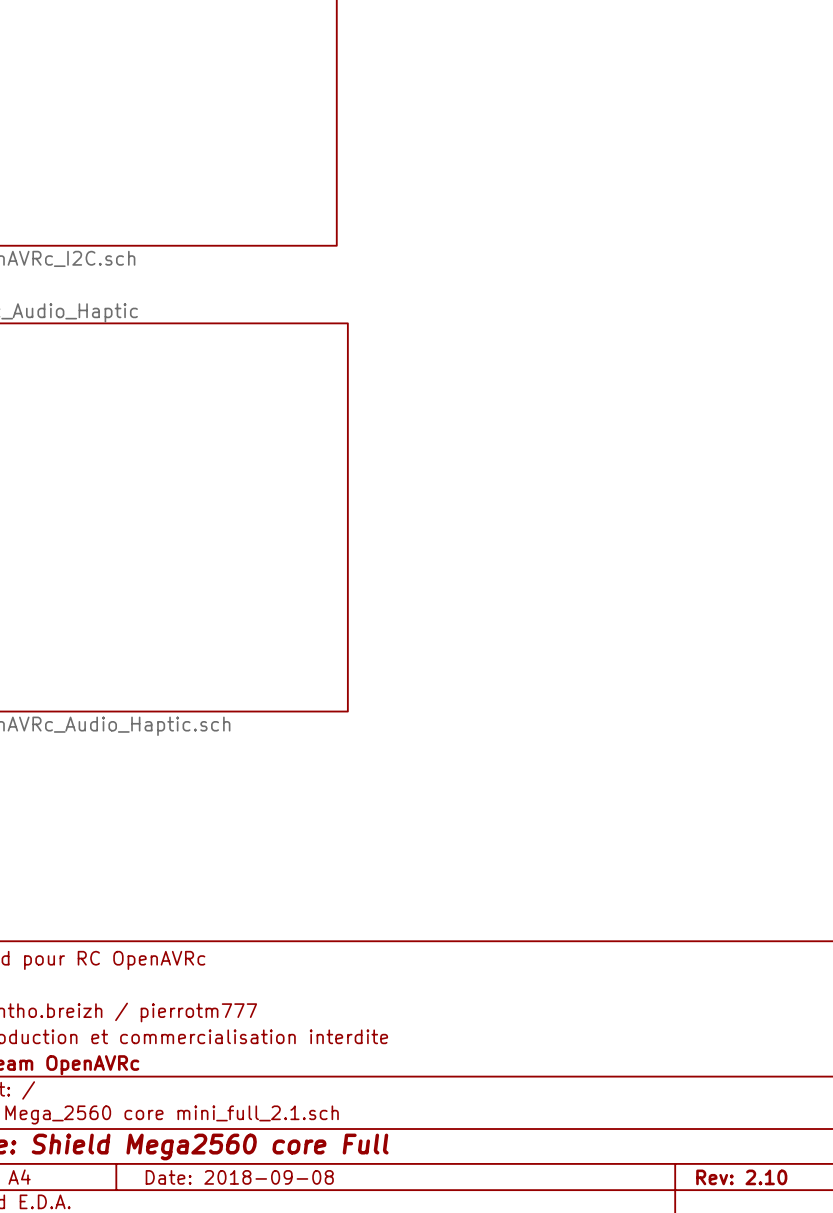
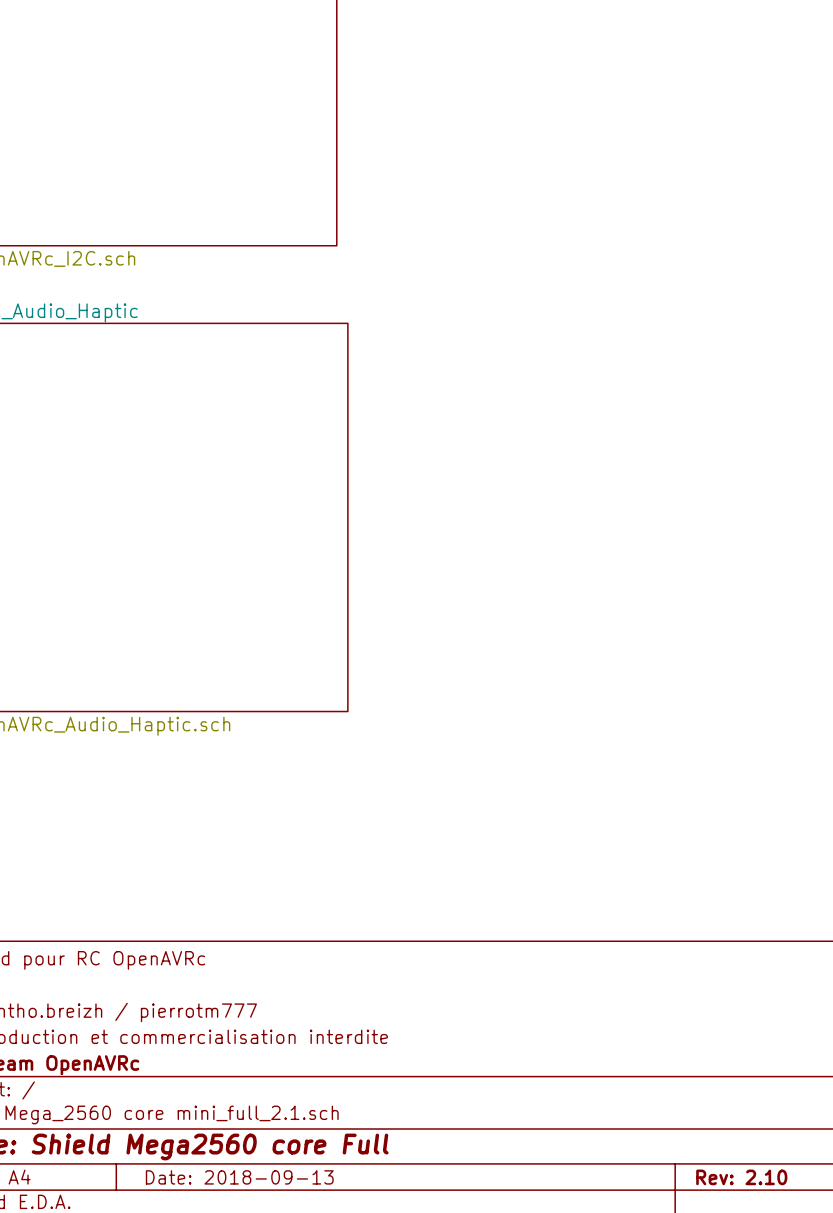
title block: Date: 2018-09-08 (239, 1177) -> Date: 2018-09-13 (239, 1177)

